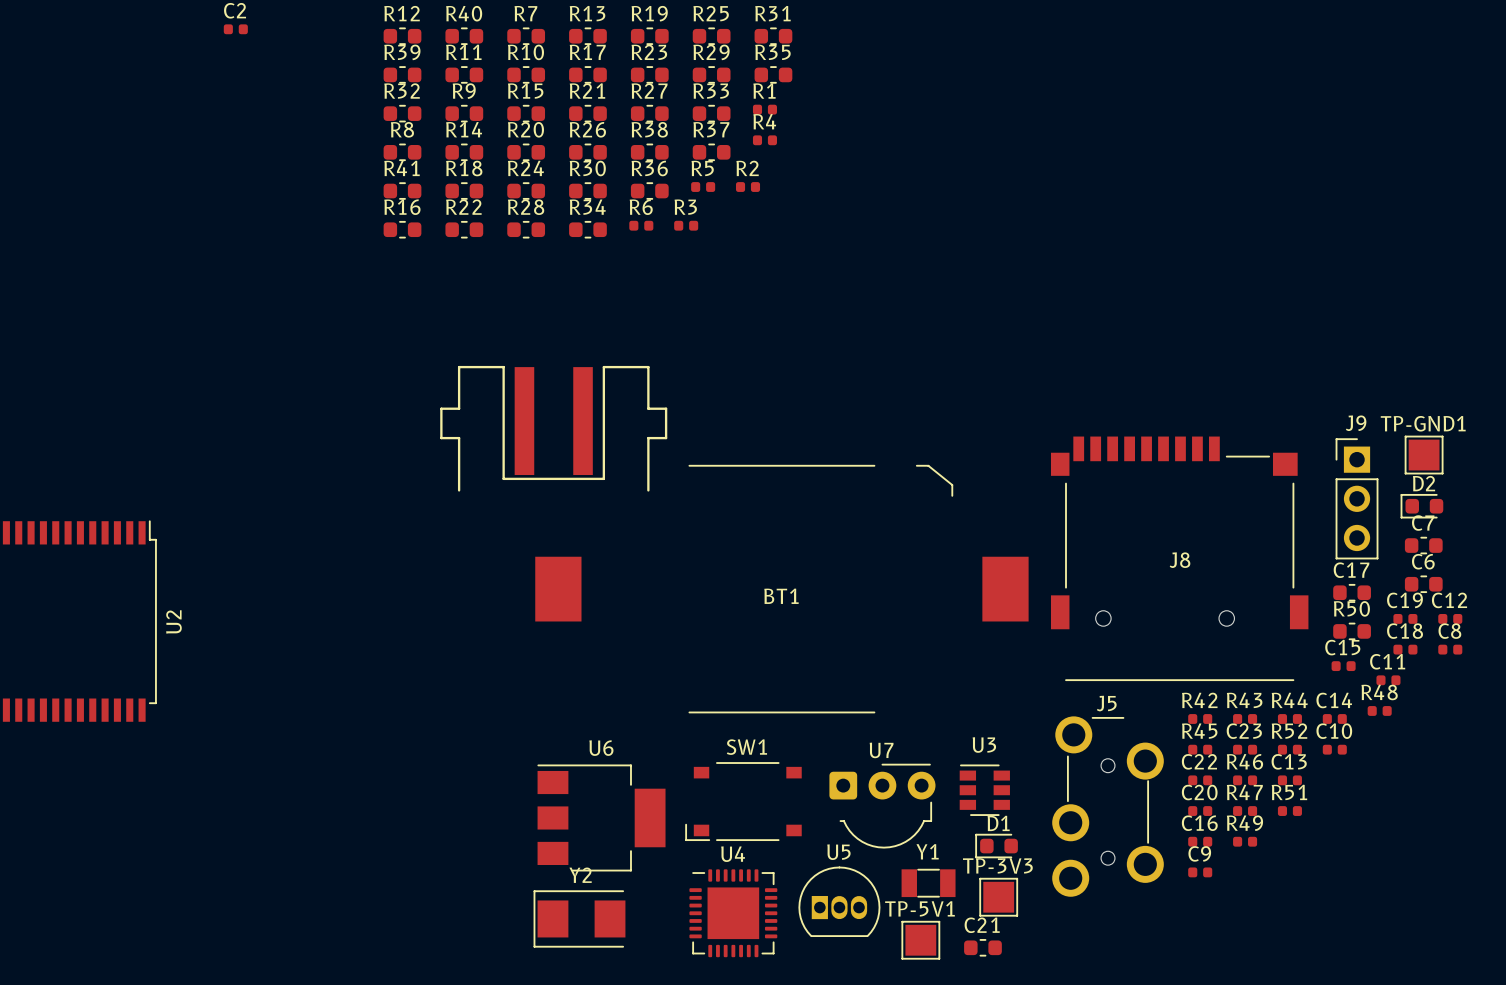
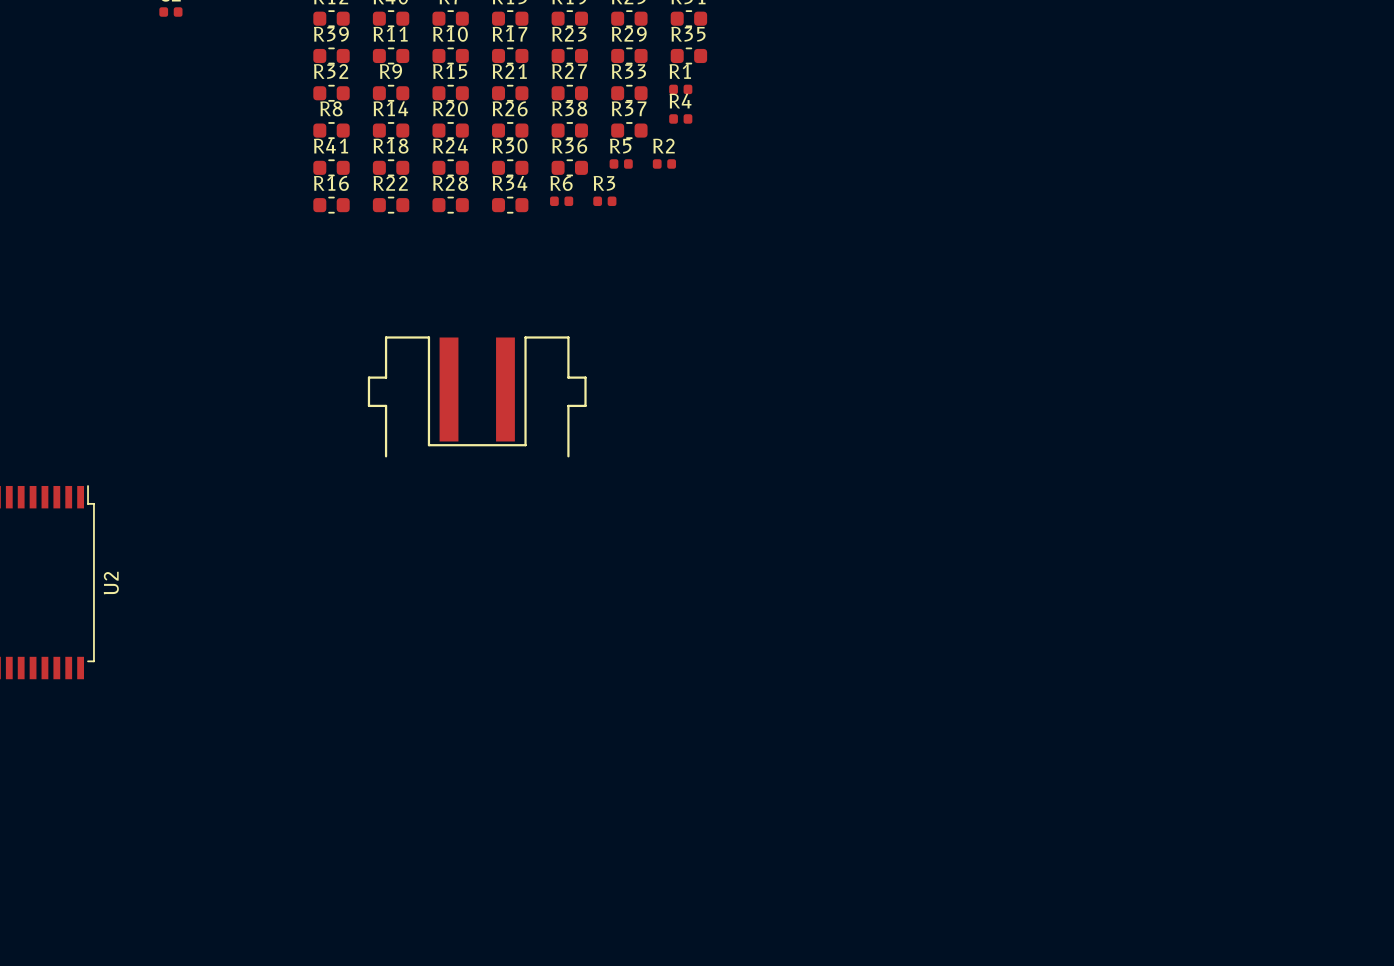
TP-GND1: (1424, 455) -> none
J9: (1357, 498) -> none
D2: (1421, 506) -> none
C7: (1423, 545) -> none
J8: (1179, 558) -> none
C6: (1423, 584) -> none
BT1: (781, 589) -> none
C17: (1352, 592) -> none
C19: (1405, 618) -> none
C12: (1450, 618) -> none
R50: (1352, 631) -> none
C18: (1405, 649) -> none
C8: (1450, 649) -> none
C15: (1343, 666) -> none
C11: (1388, 680) -> none
R48: (1379, 710) -> none
R42: (1200, 718) -> none
R43: (1245, 718) -> none
R44: (1289, 718) -> none
C14: (1334, 718) -> none
R45: (1200, 749) -> none
C23: (1245, 749) -> none
R52: (1289, 749) -> none
C10: (1334, 749) -> none
C22: (1200, 780) -> none
R46: (1245, 780) -> none
C13: (1289, 780) -> none
U3: (984, 790) -> none
SW1: (743, 801) -> none
U7: (882, 806) -> none
J5: (1108, 806) -> none
C20: (1200, 811) -> none
R47: (1245, 811) -> none
R51: (1289, 811) -> none
U6: (601, 817) -> none
C16: (1200, 841) -> none
R49: (1245, 841) -> none
D1: (996, 846) -> none
C9: (1200, 872) -> none
Y1: (928, 883) -> none
TP-3V3: (998, 897) -> none
U5: (839, 901) -> none
U4: (733, 913) -> none
Y2: (579, 918) -> none
TP-5V1: (920, 940) -> none
C21: (982, 947) -> none

